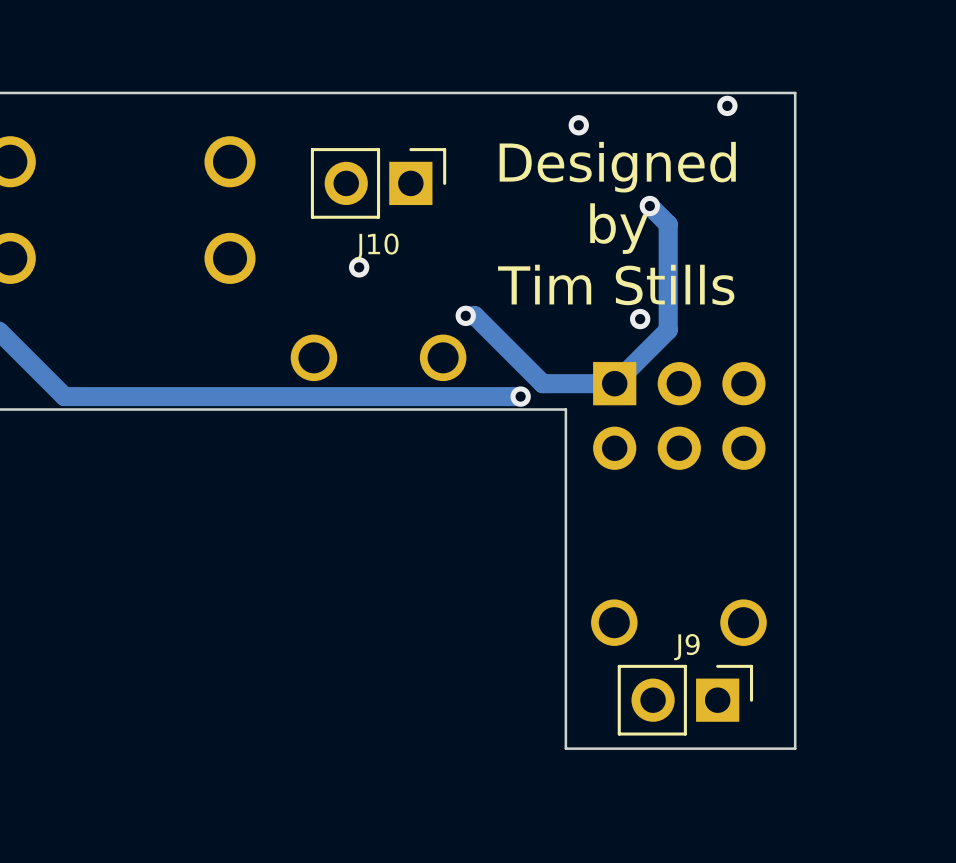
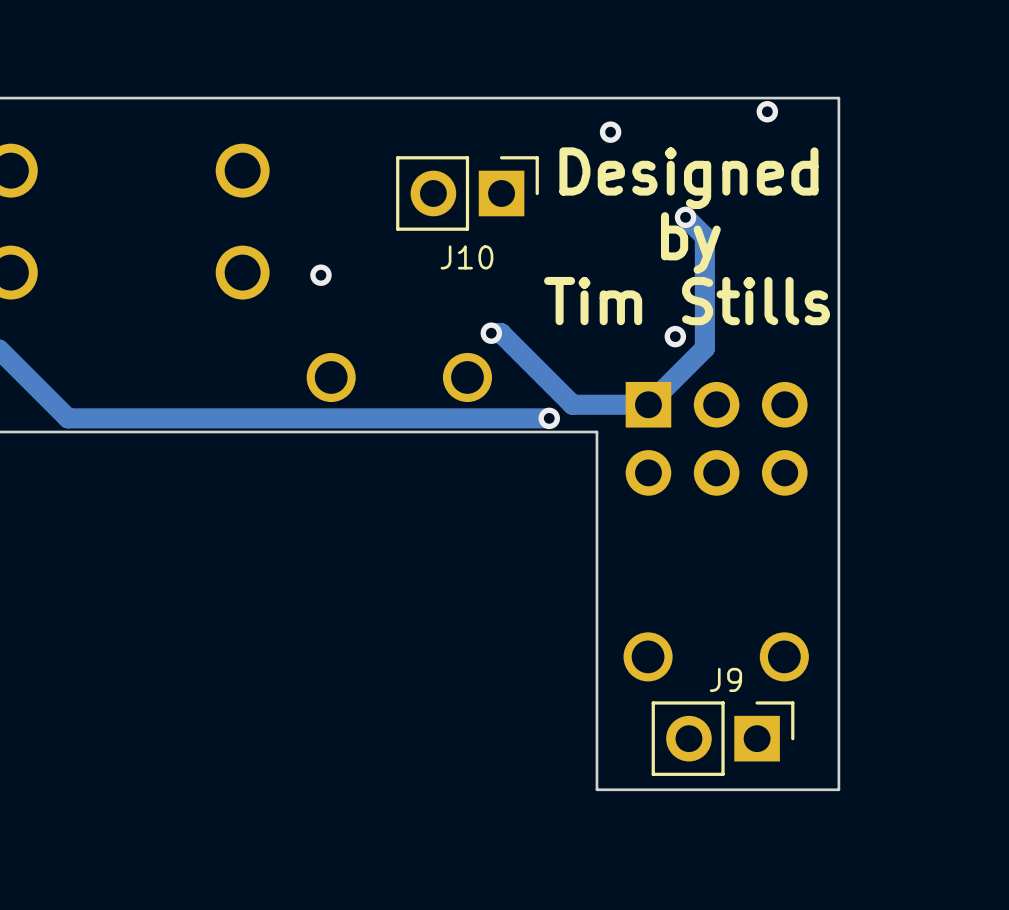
text position: Designed (617, 167) -> Designed (688, 178)
J10 position: (378, 183) -> (467, 193)
text position: by (619, 228) -> by (690, 242)
via position: (359, 267) -> (320, 275)
text position: Tim Stills (616, 284) -> Tim Stills (687, 301)

